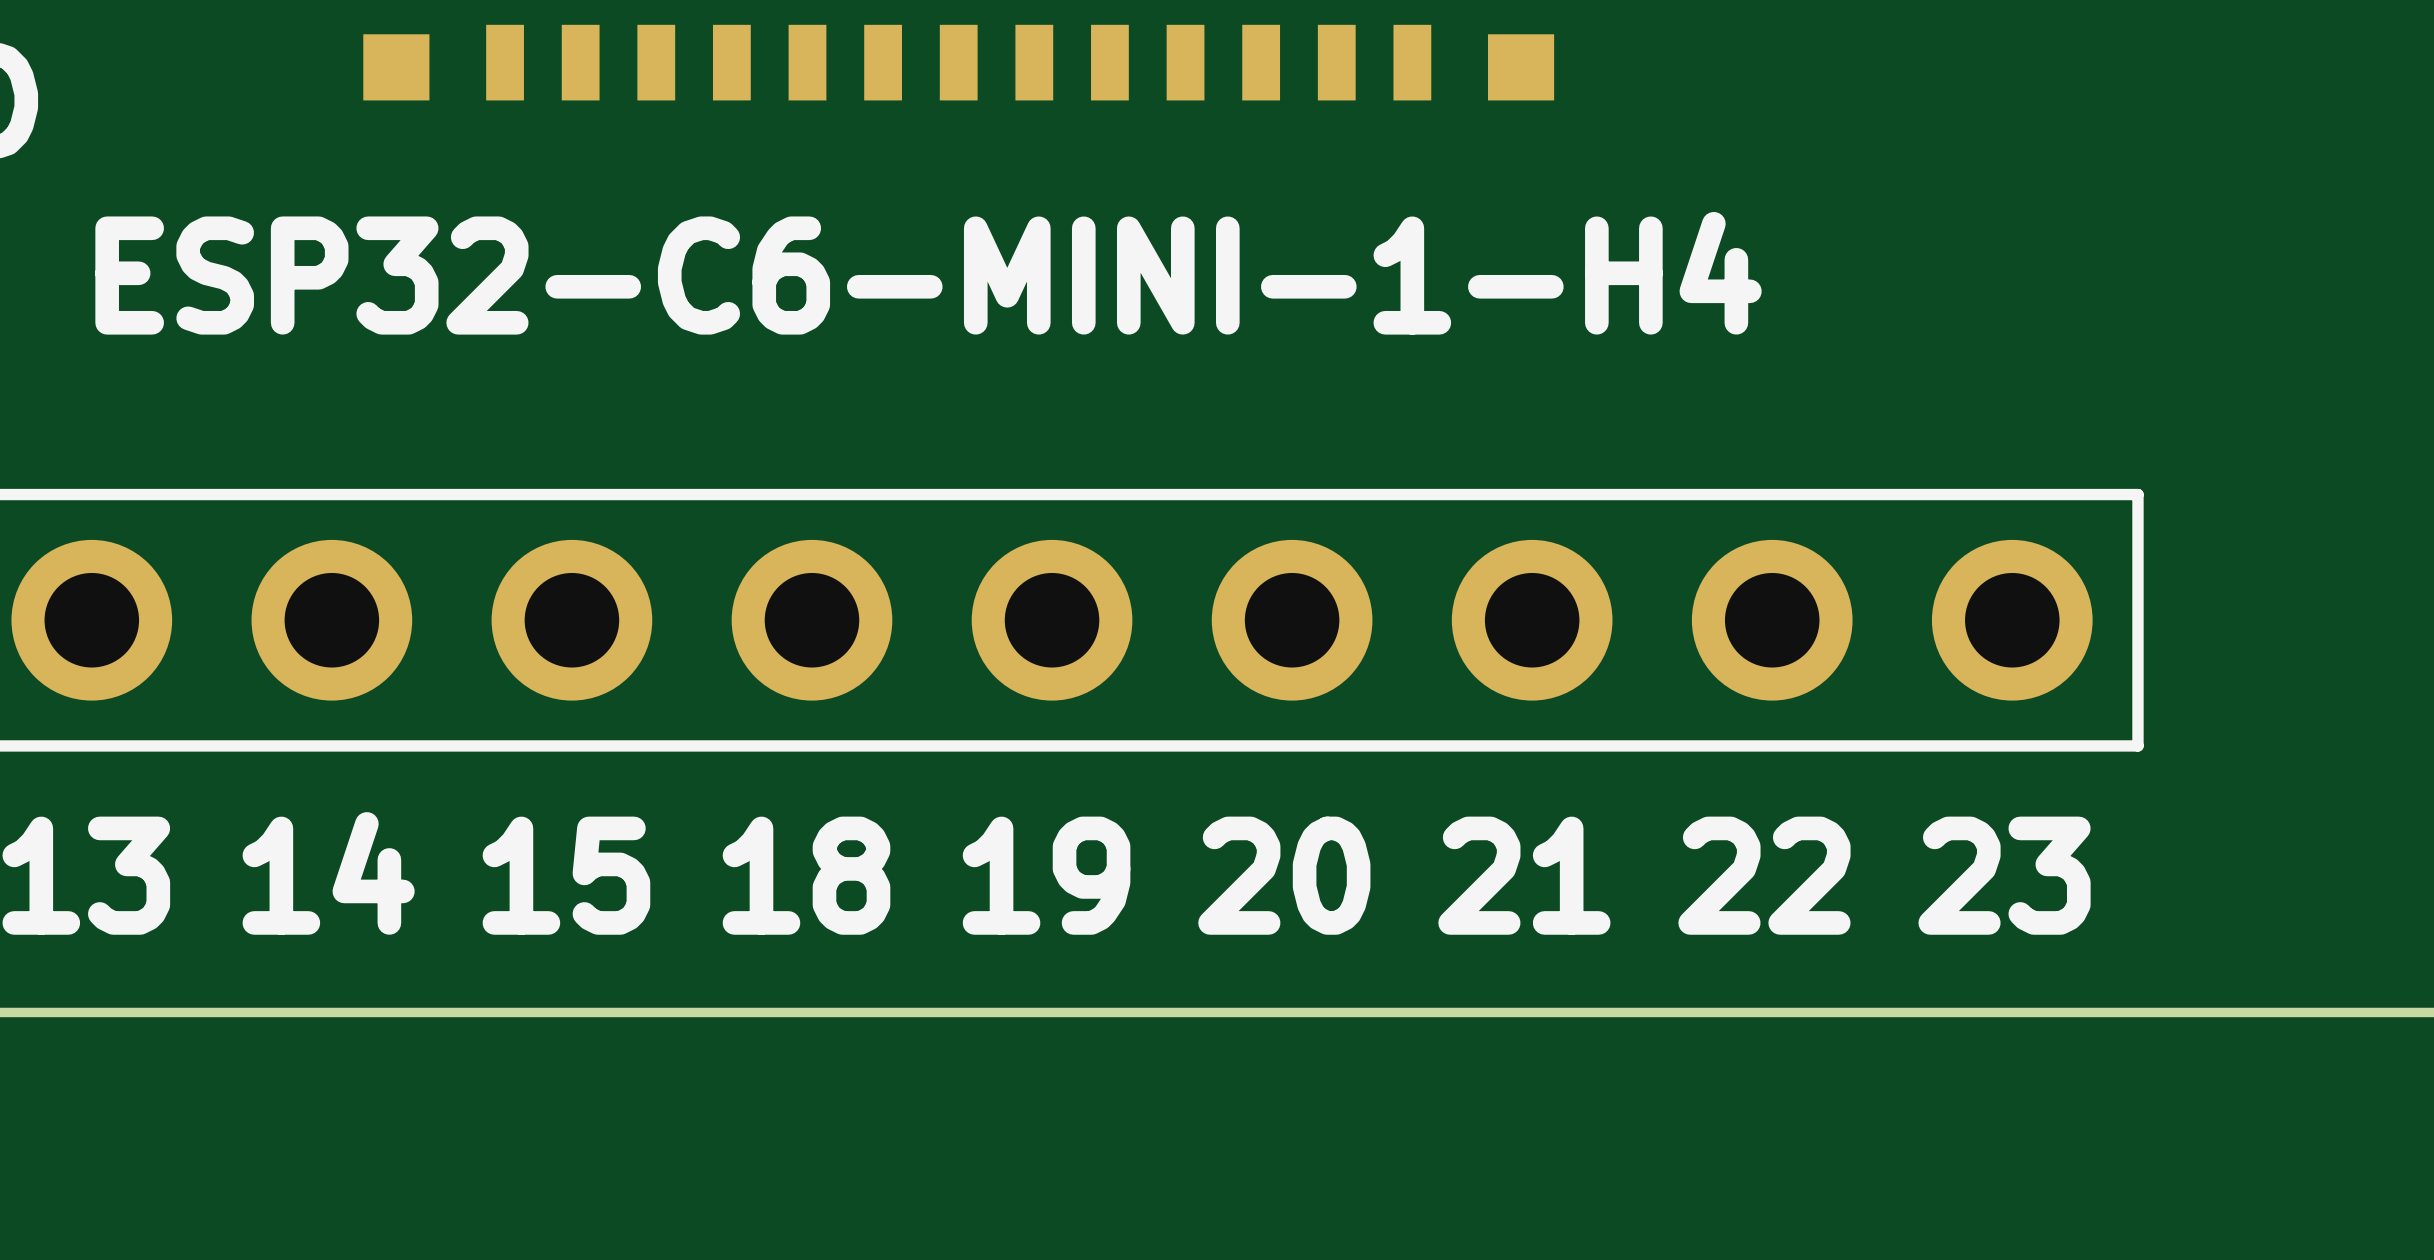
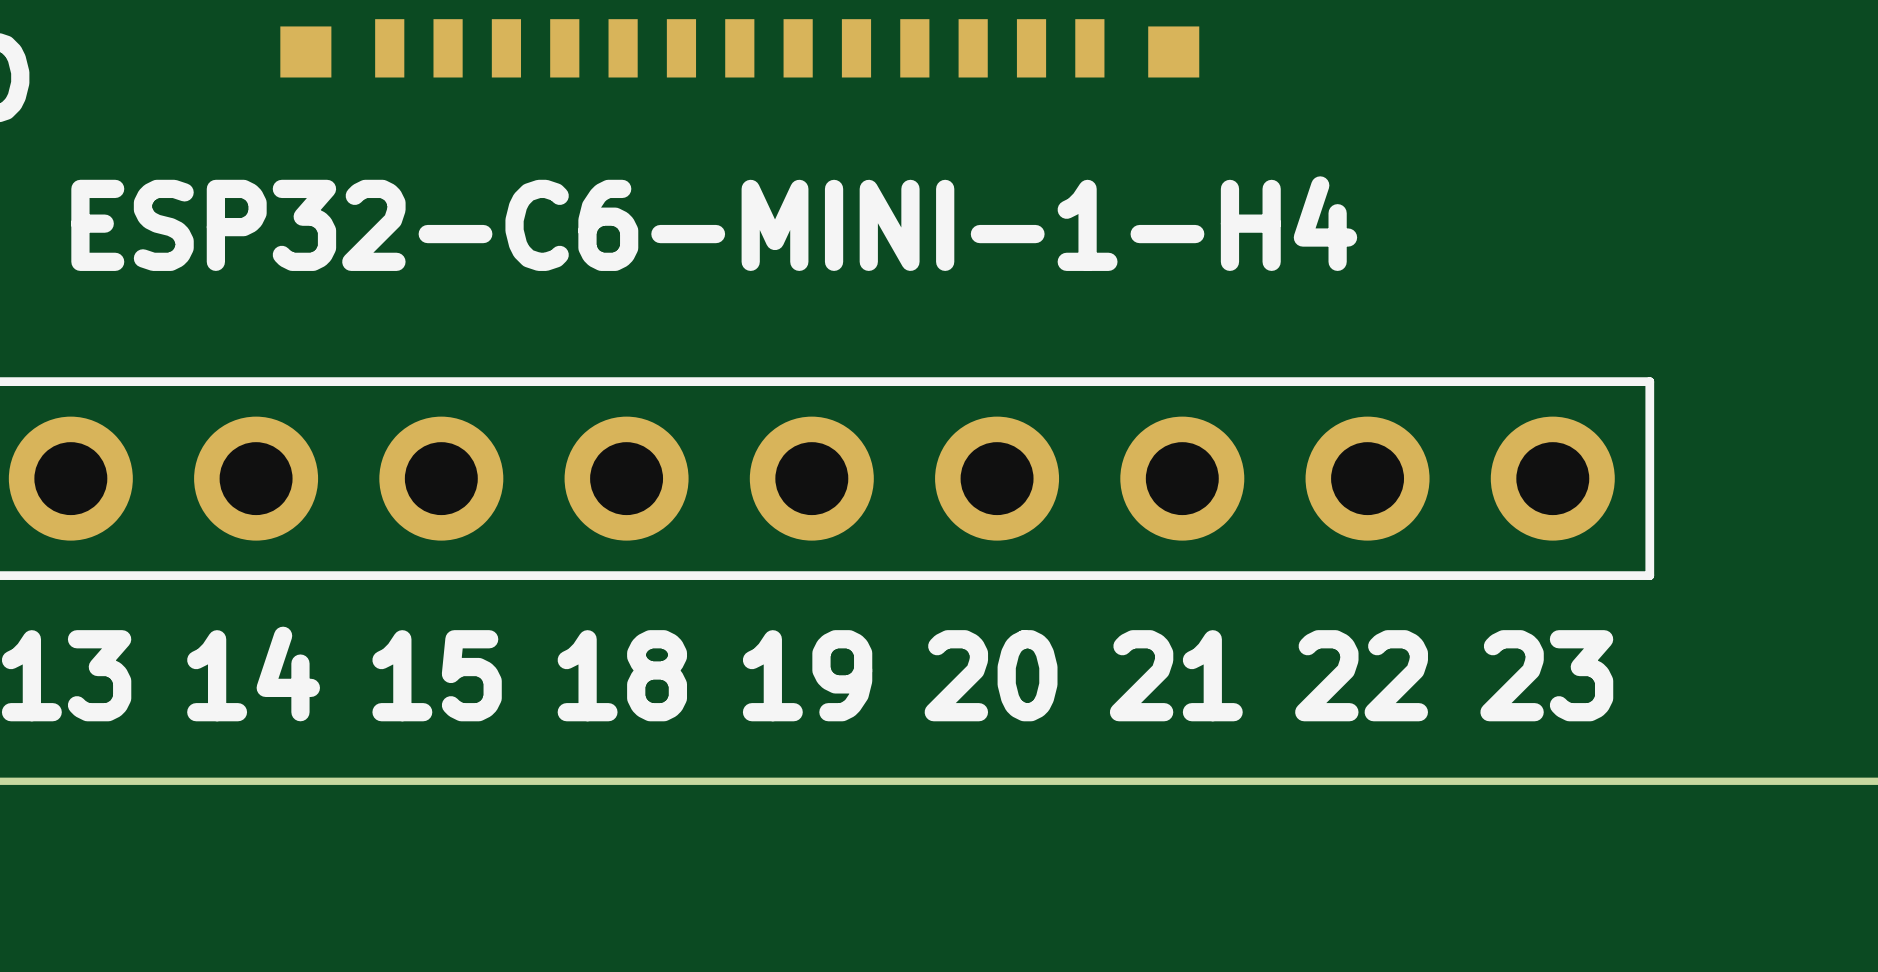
text position: ESP32-C6-MINI-1-H4 (928, 273) -> ESP32-C6-MINI-1-H4 (714, 223)

